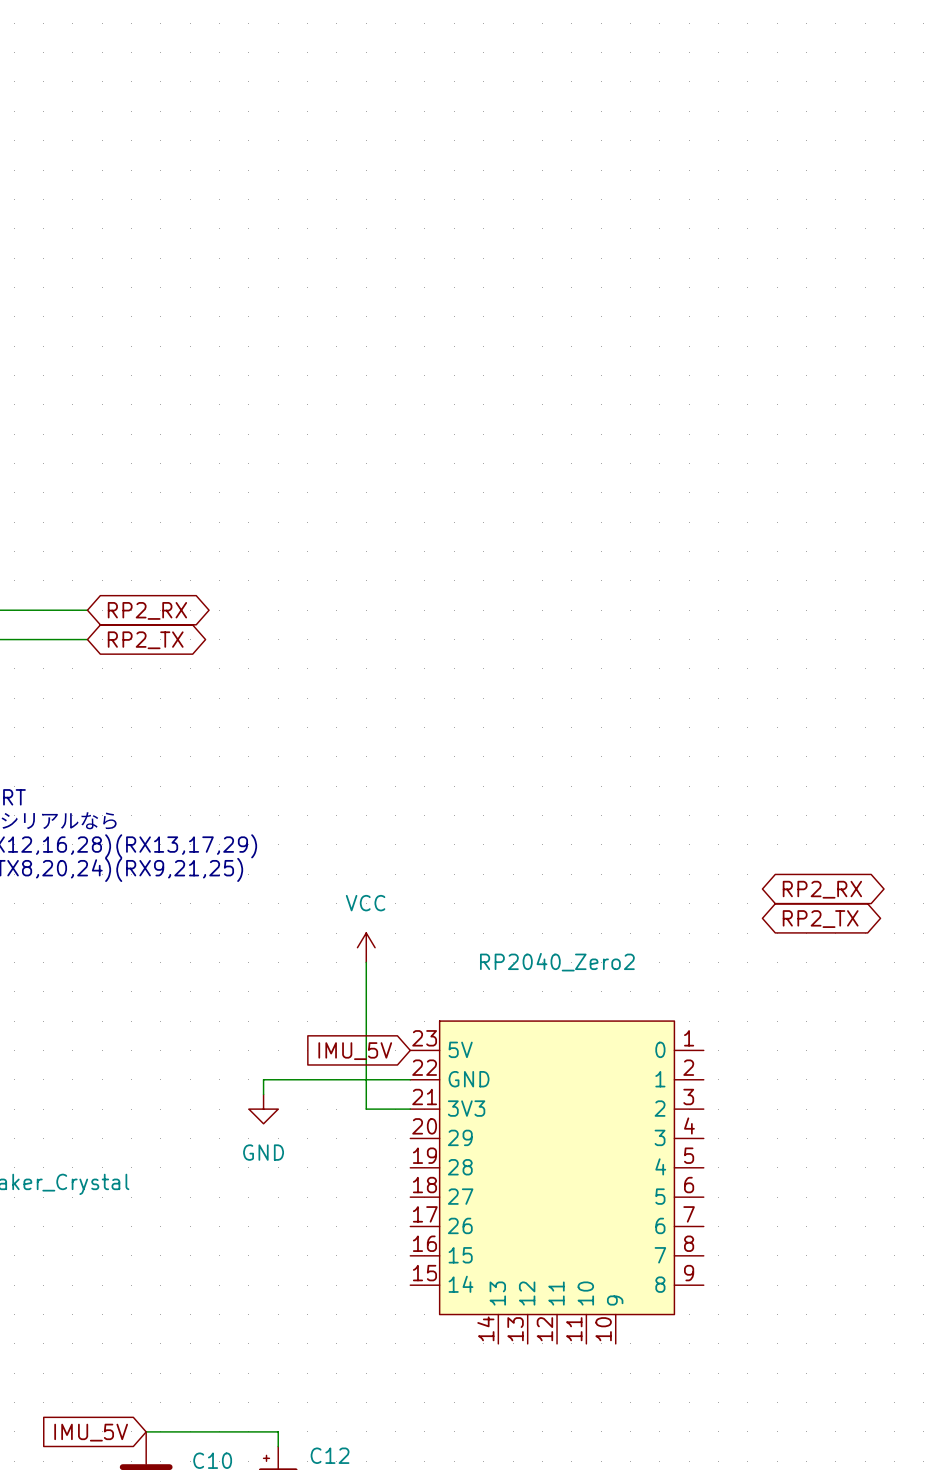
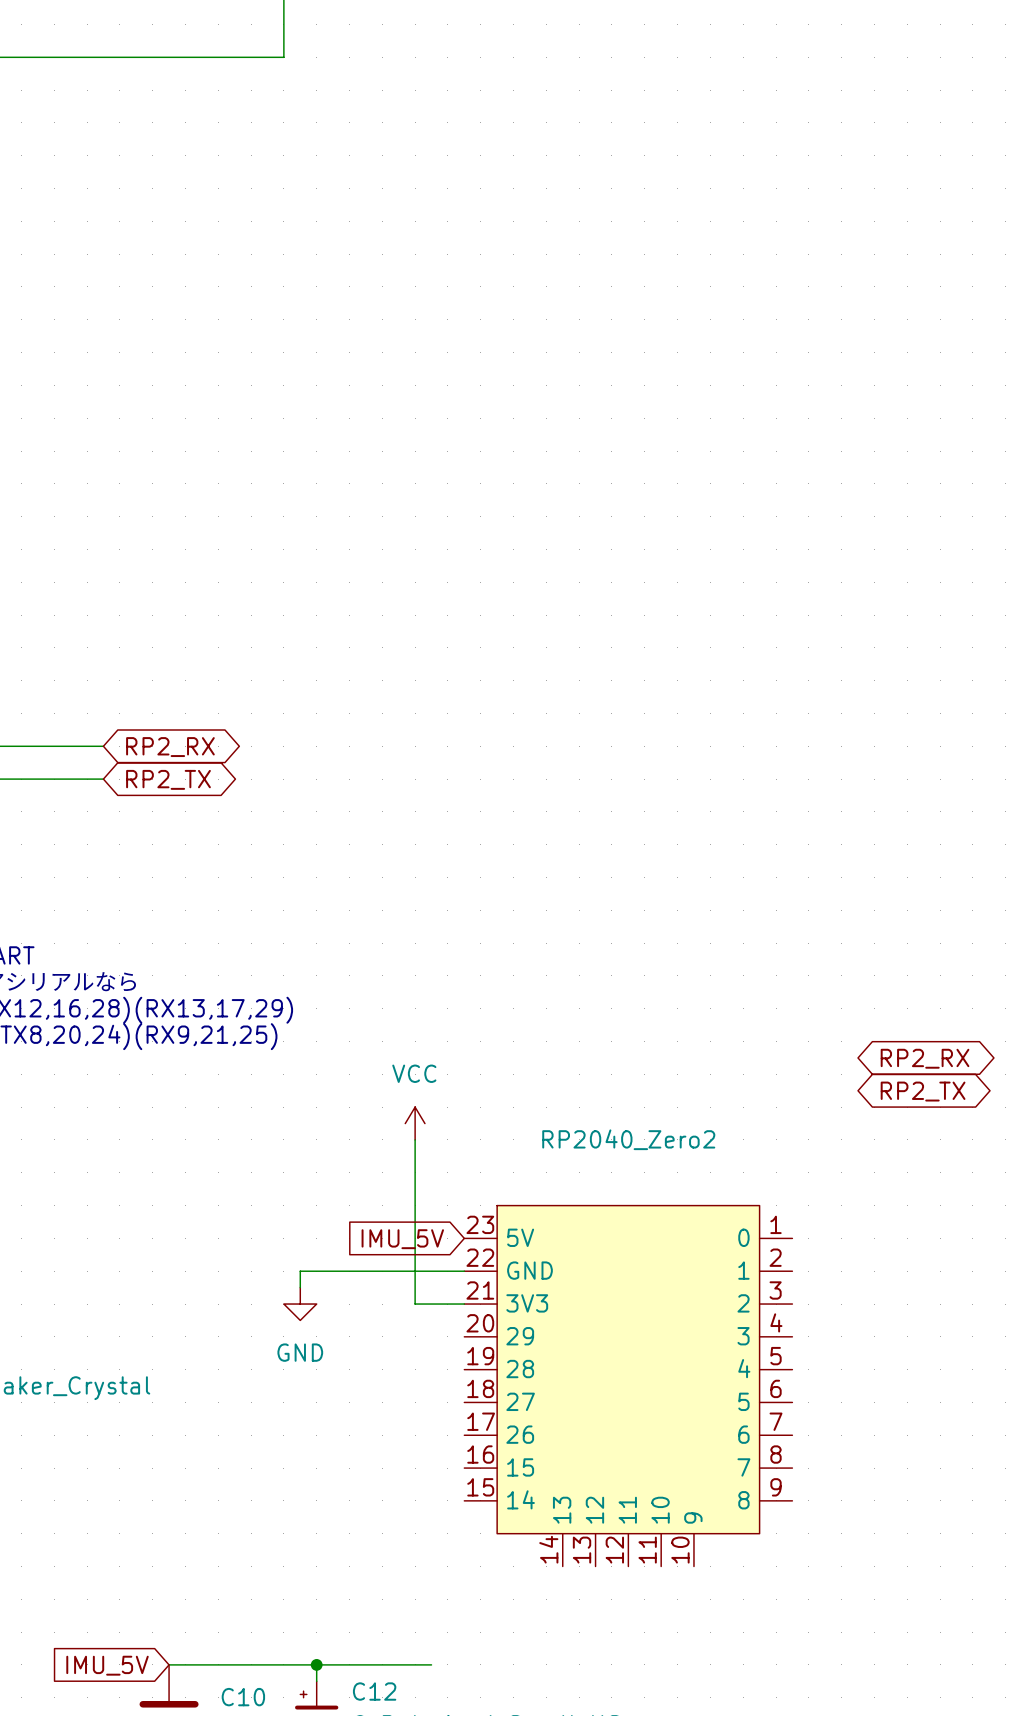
wire: none -> (316, 1664) (431, 1664)
junction: none -> (316, 1664)

